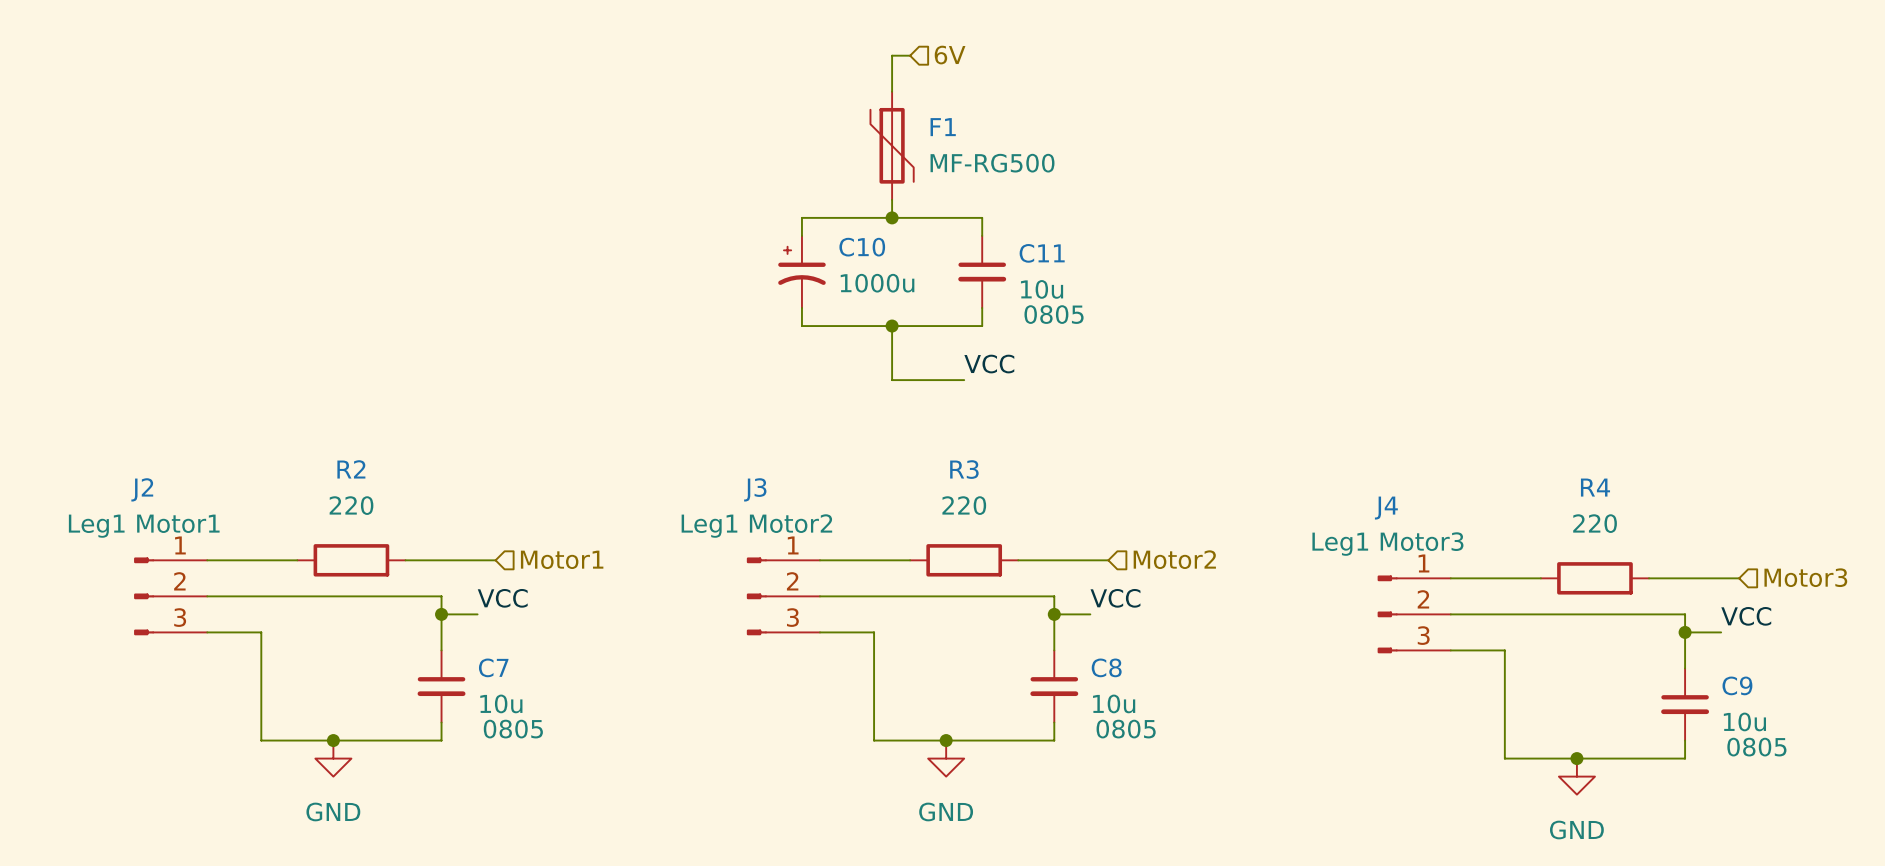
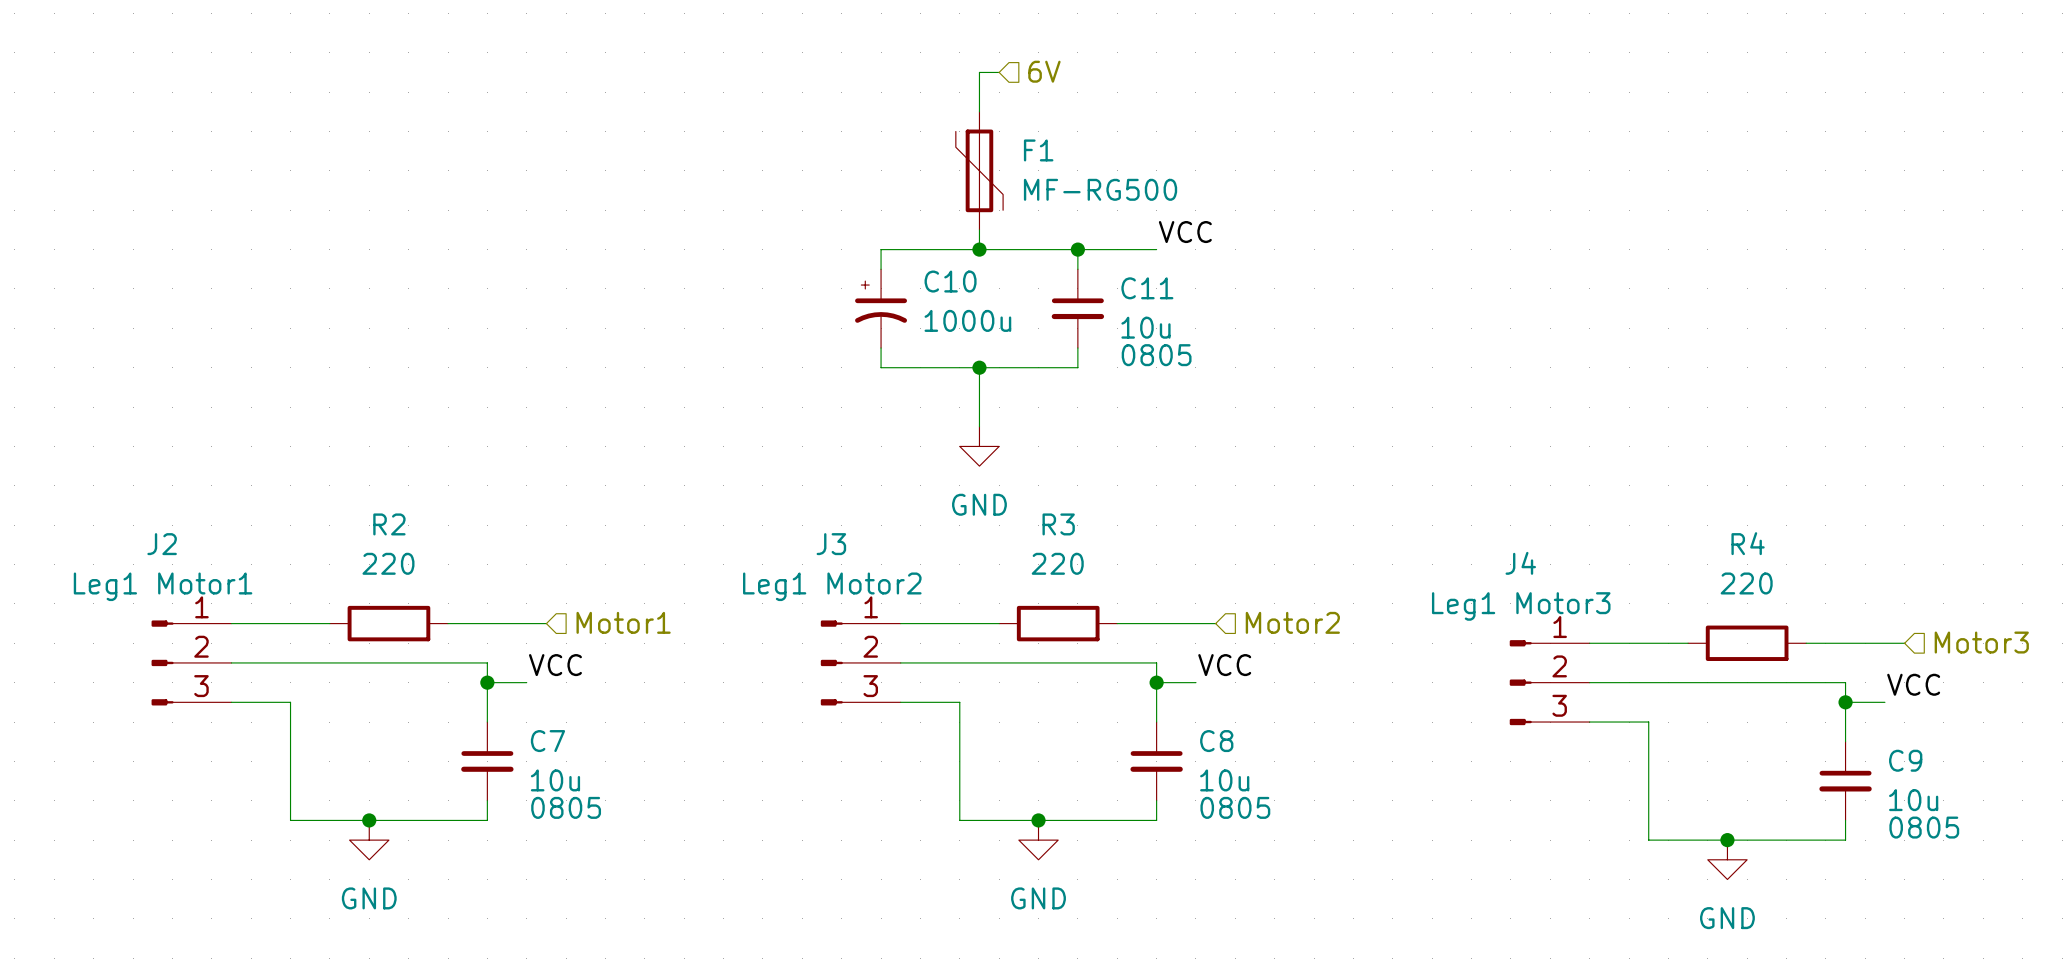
junction: none -> (1077, 249)
label position: VCC (989, 364) -> VCC (1185, 232)
wire: (892, 380) (964, 380) -> (1077, 249) (1156, 249)
power symbol: none -> GND (979, 446)

